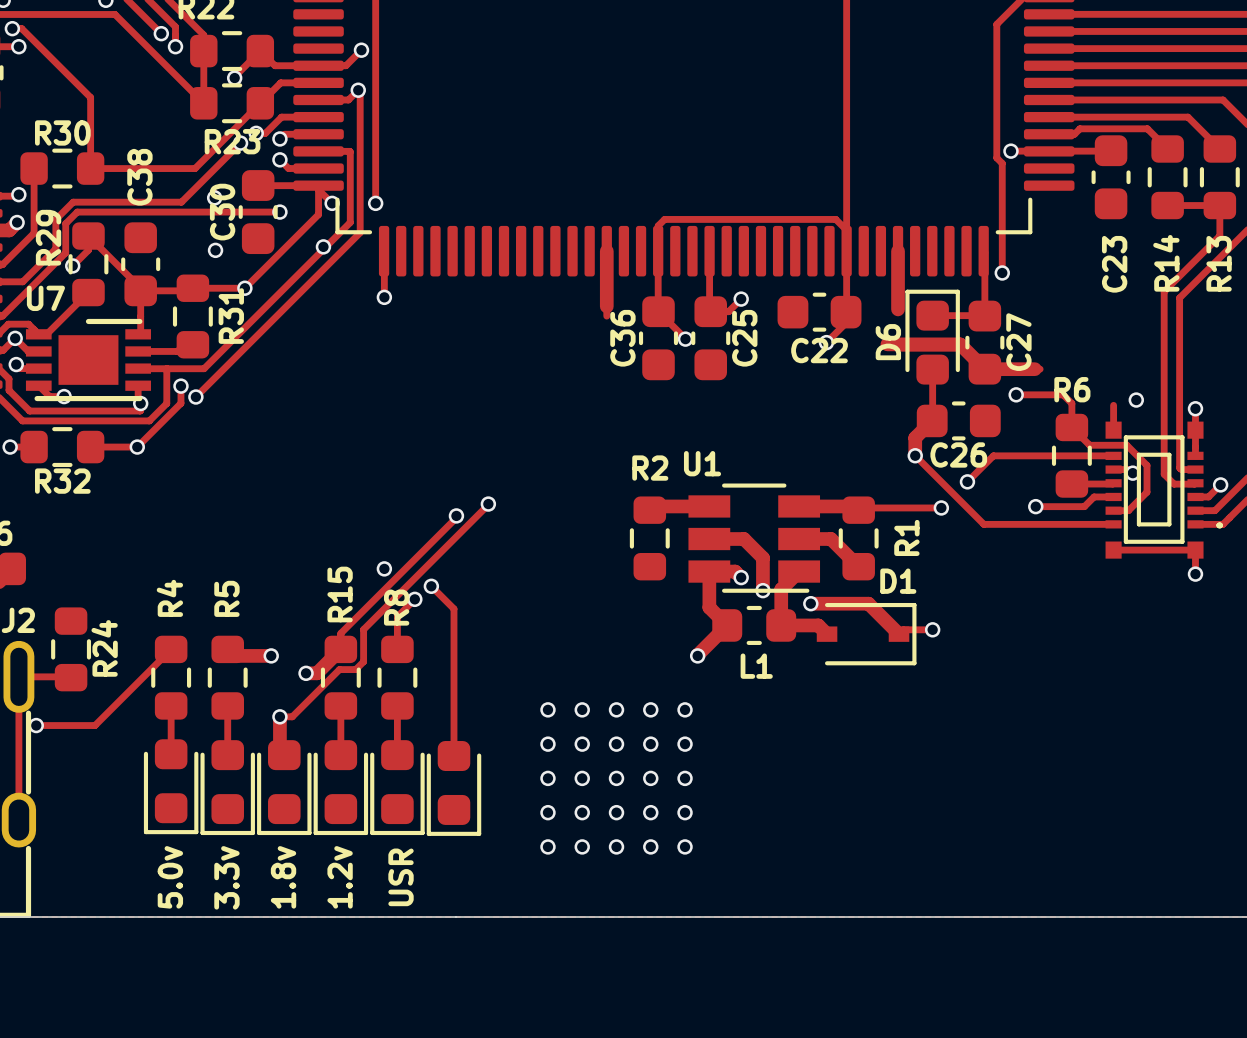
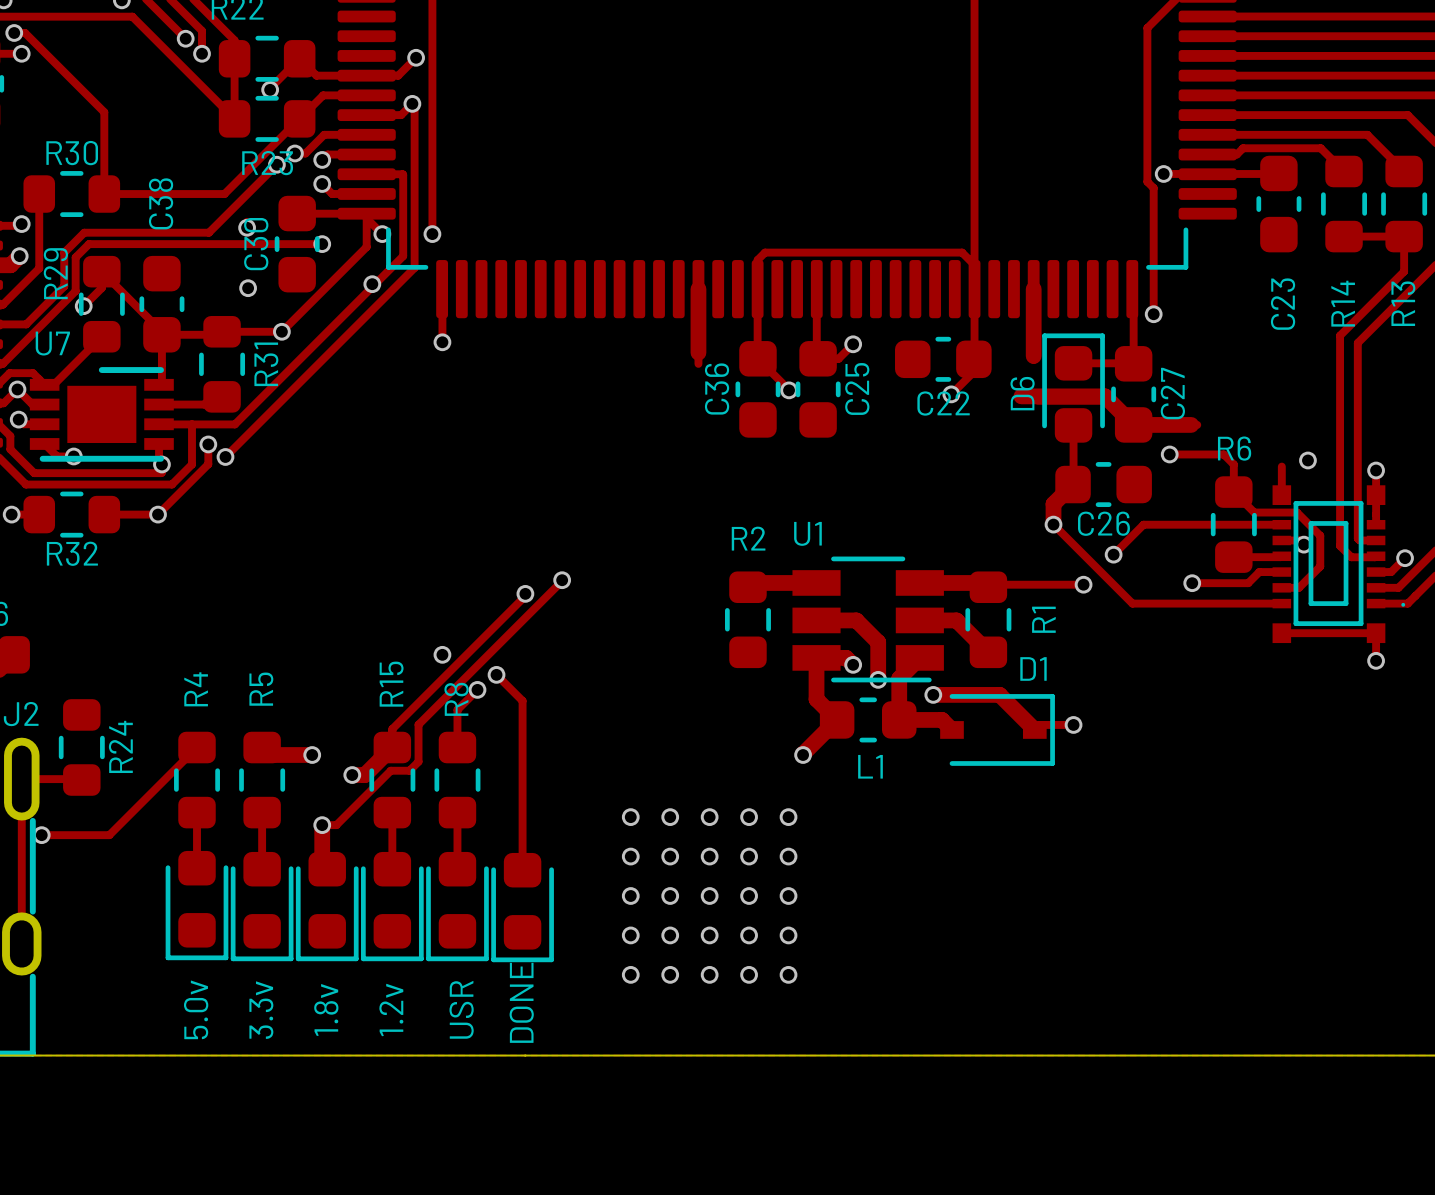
text: none -> DONE (521, 1002)

